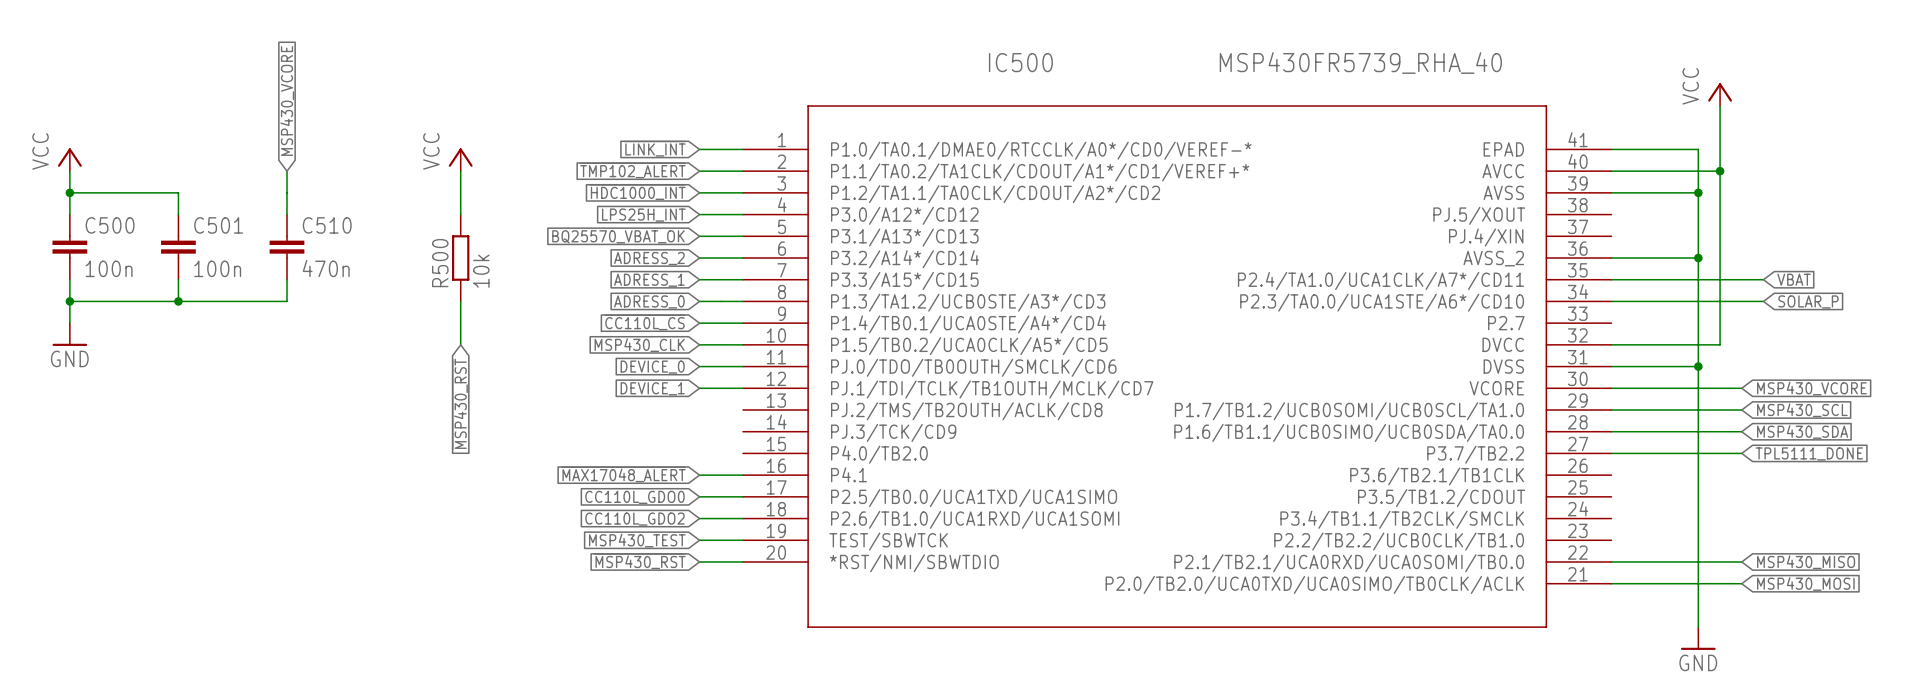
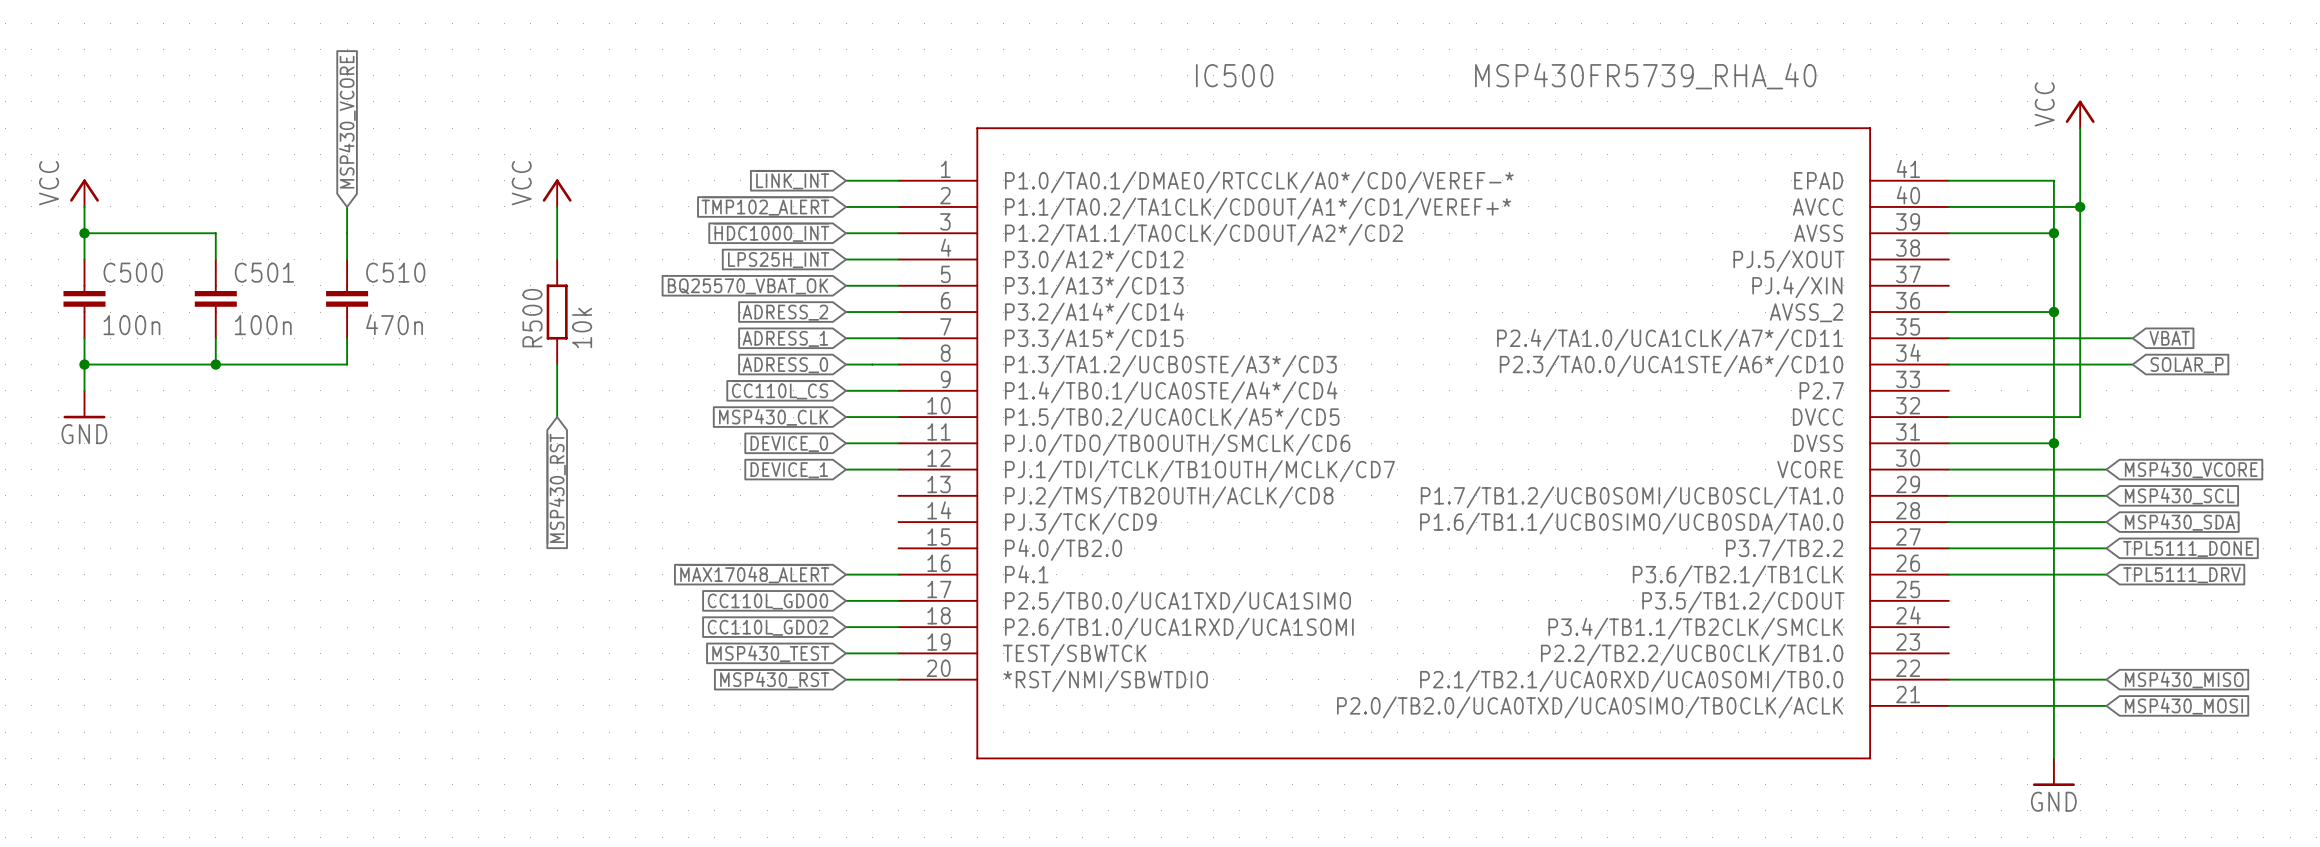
wire: none -> (1948, 574) (2106, 574)
global label: none -> TPL5111_DRV (2181, 575)

